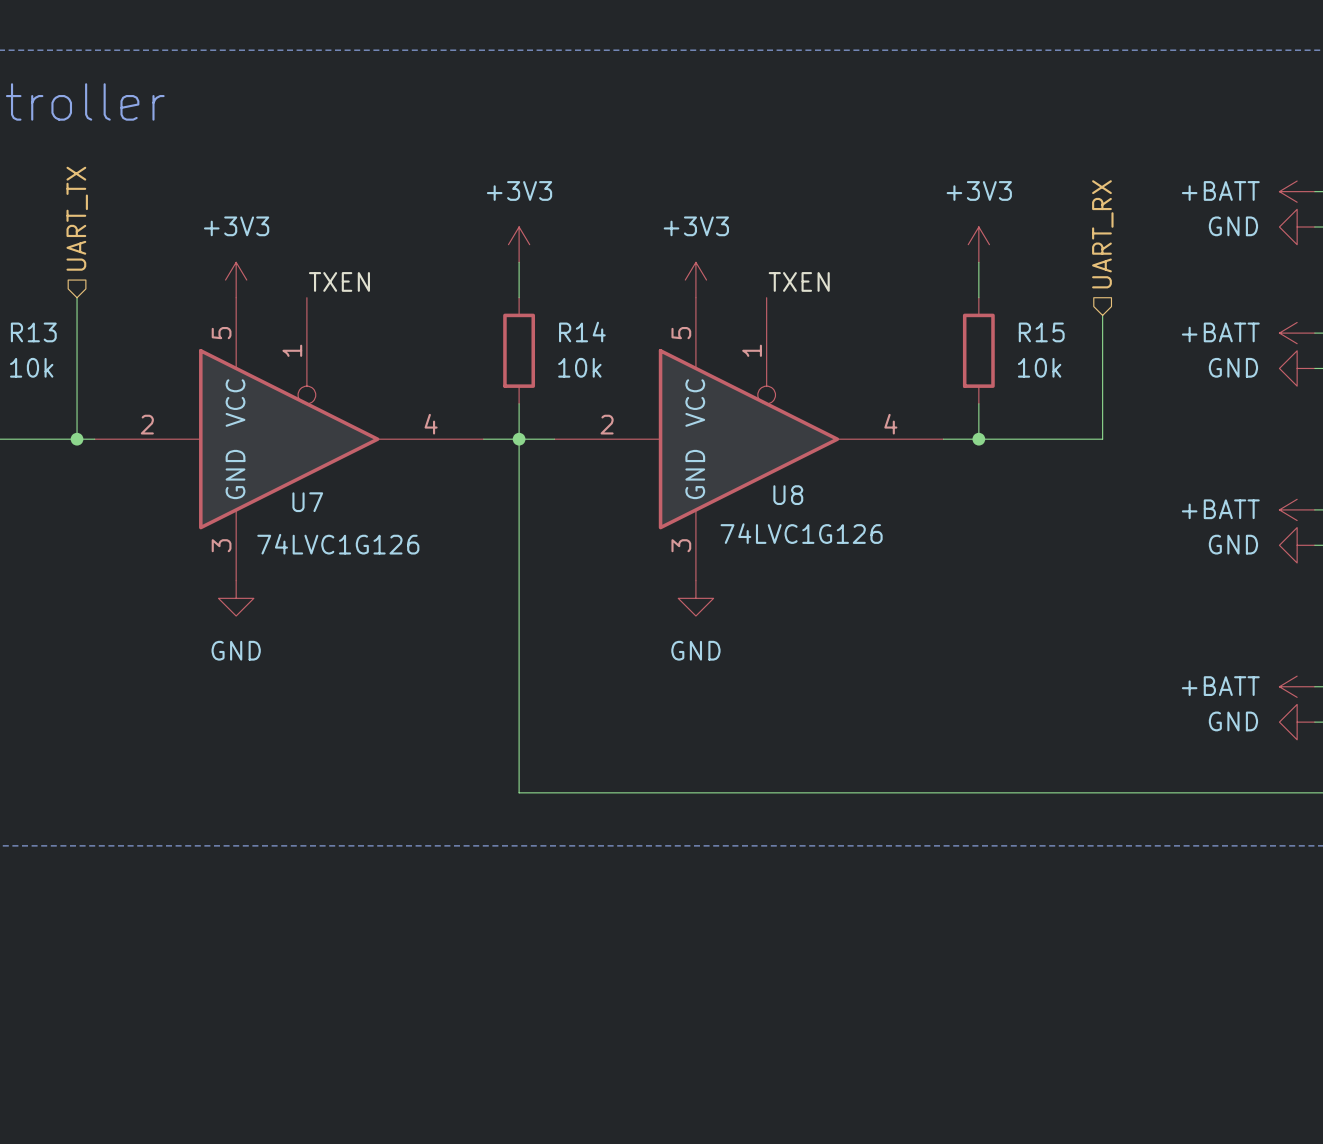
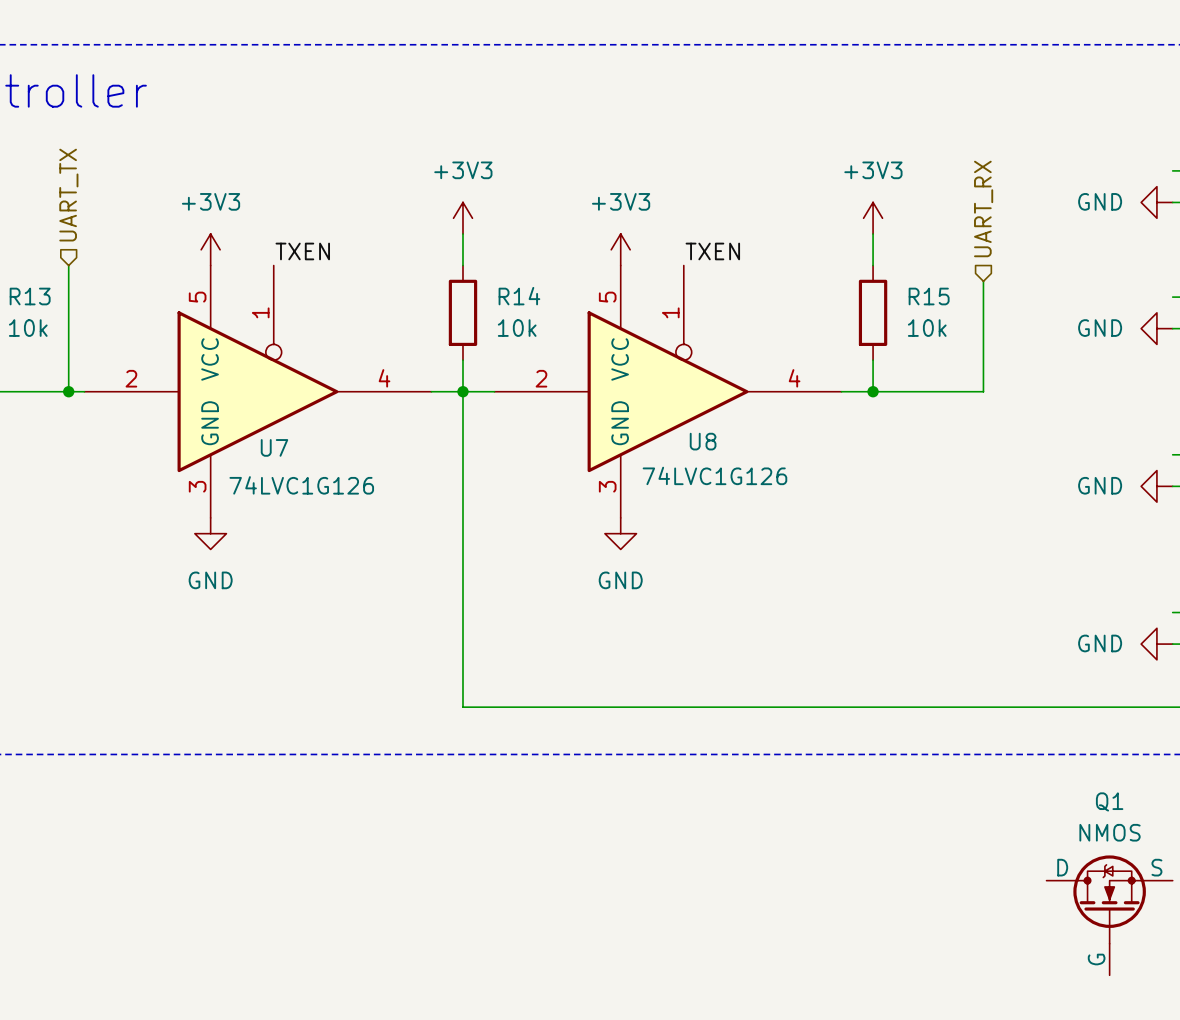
power symbol: +BATT (1297, 191) -> none
power symbol: +BATT (1297, 333) -> none
power symbol: +BATT (1297, 509) -> none
power symbol: +BATT (1297, 686) -> none
Q1: none -> NMOS (1109, 915)

